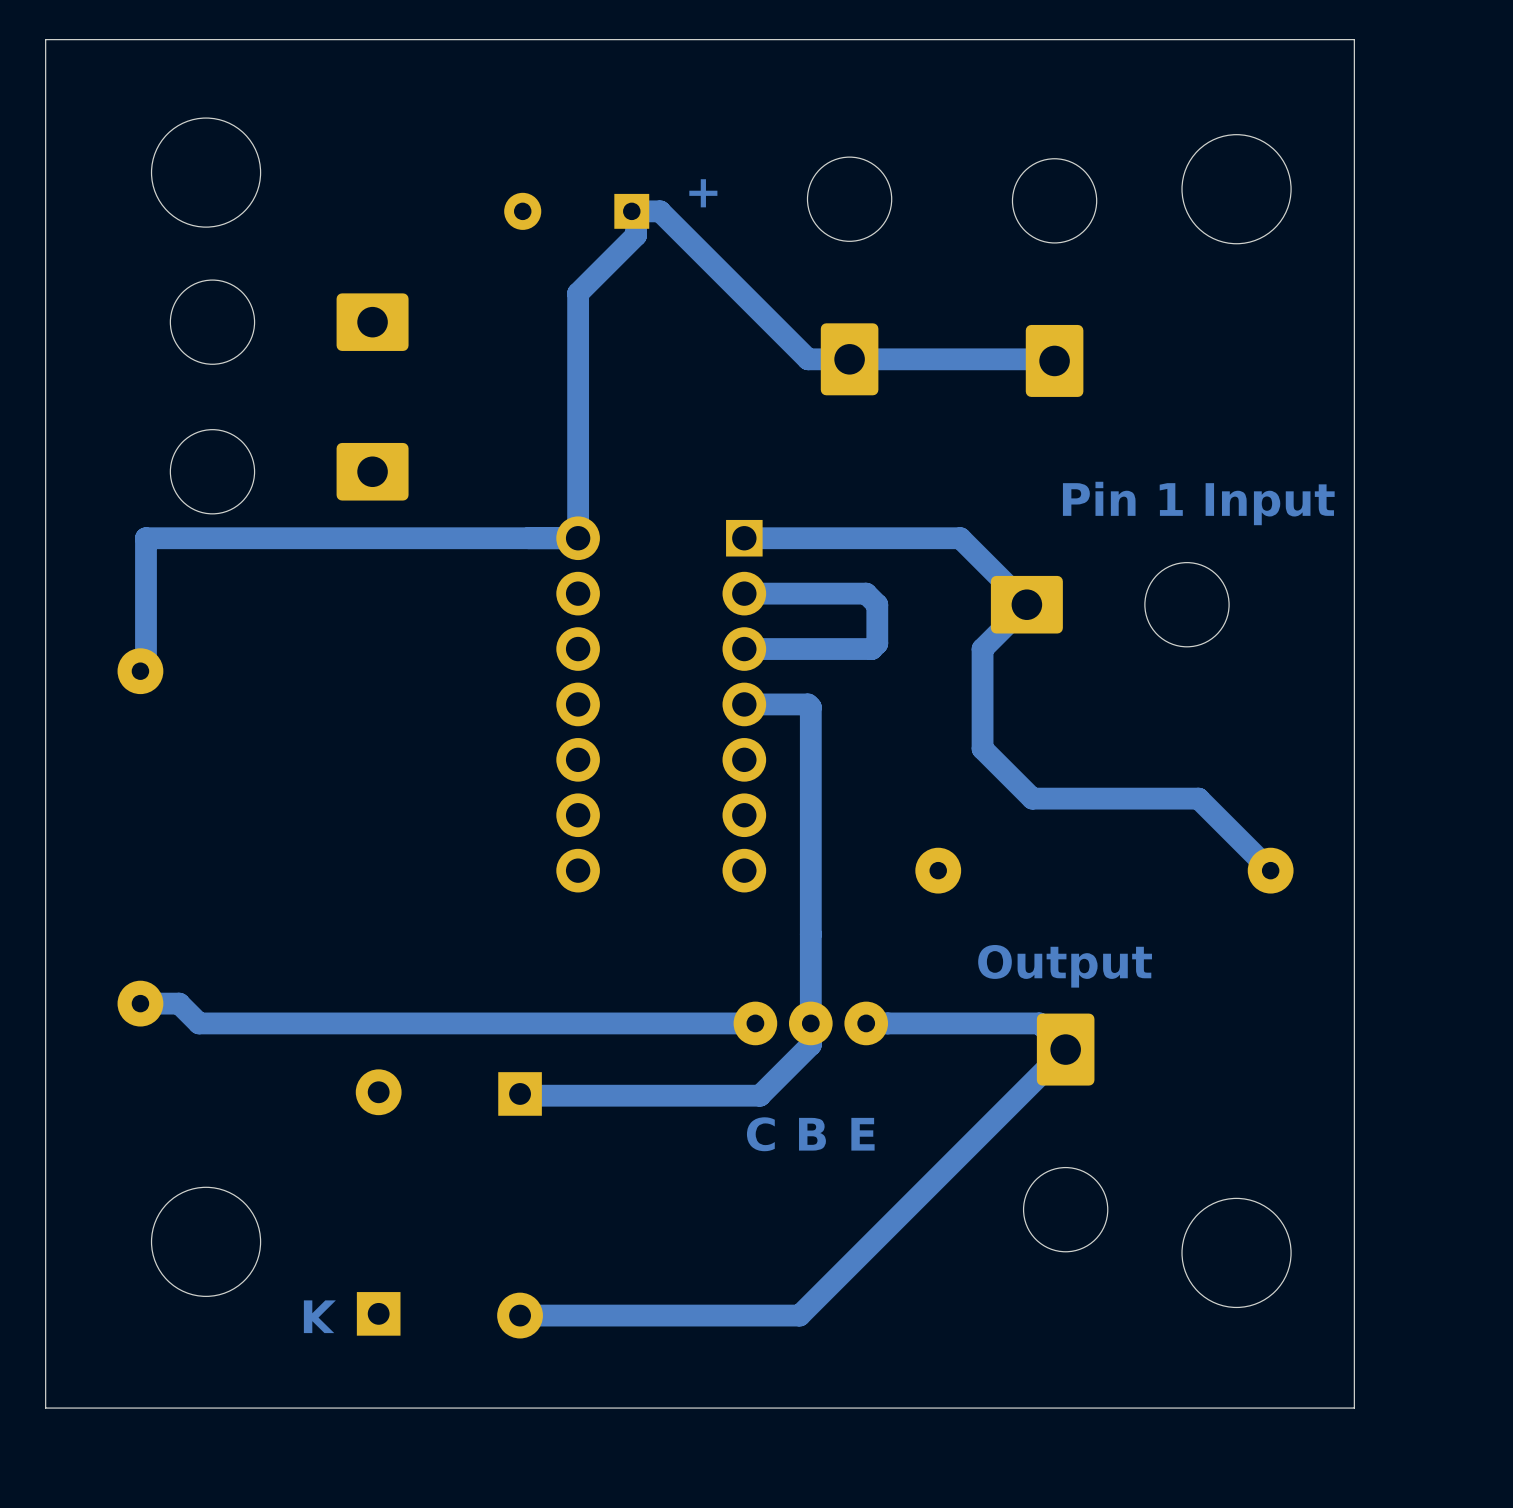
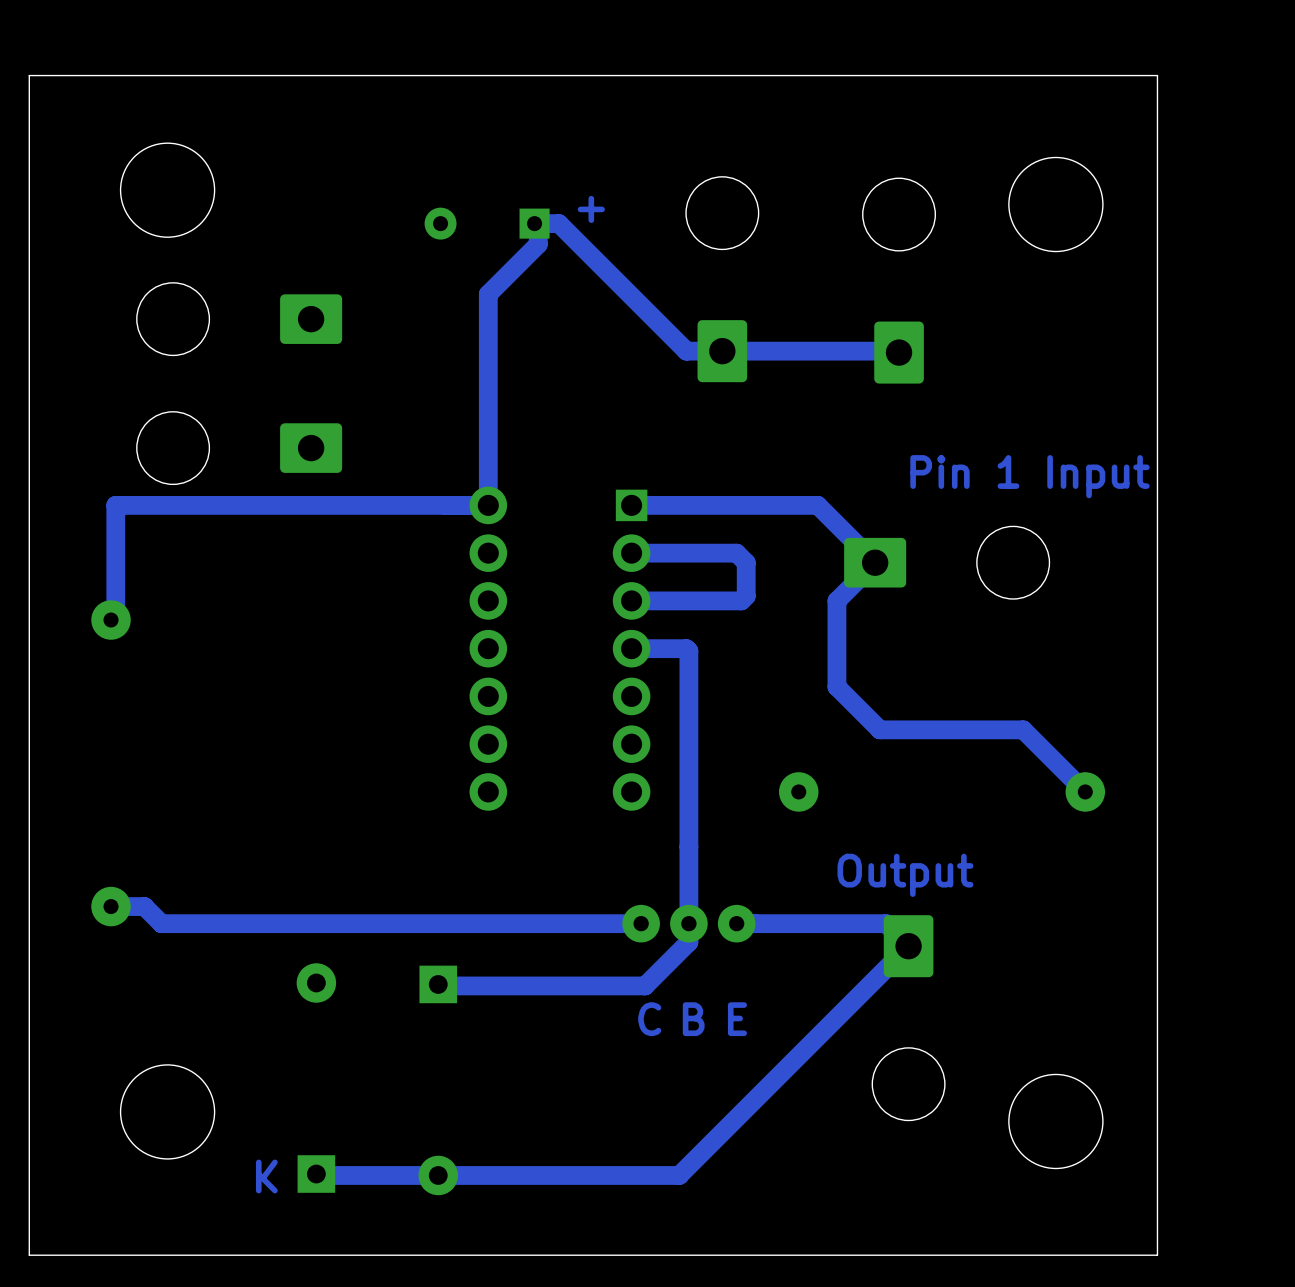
bottom track: none -> (316, 1174) (438, 1175)

